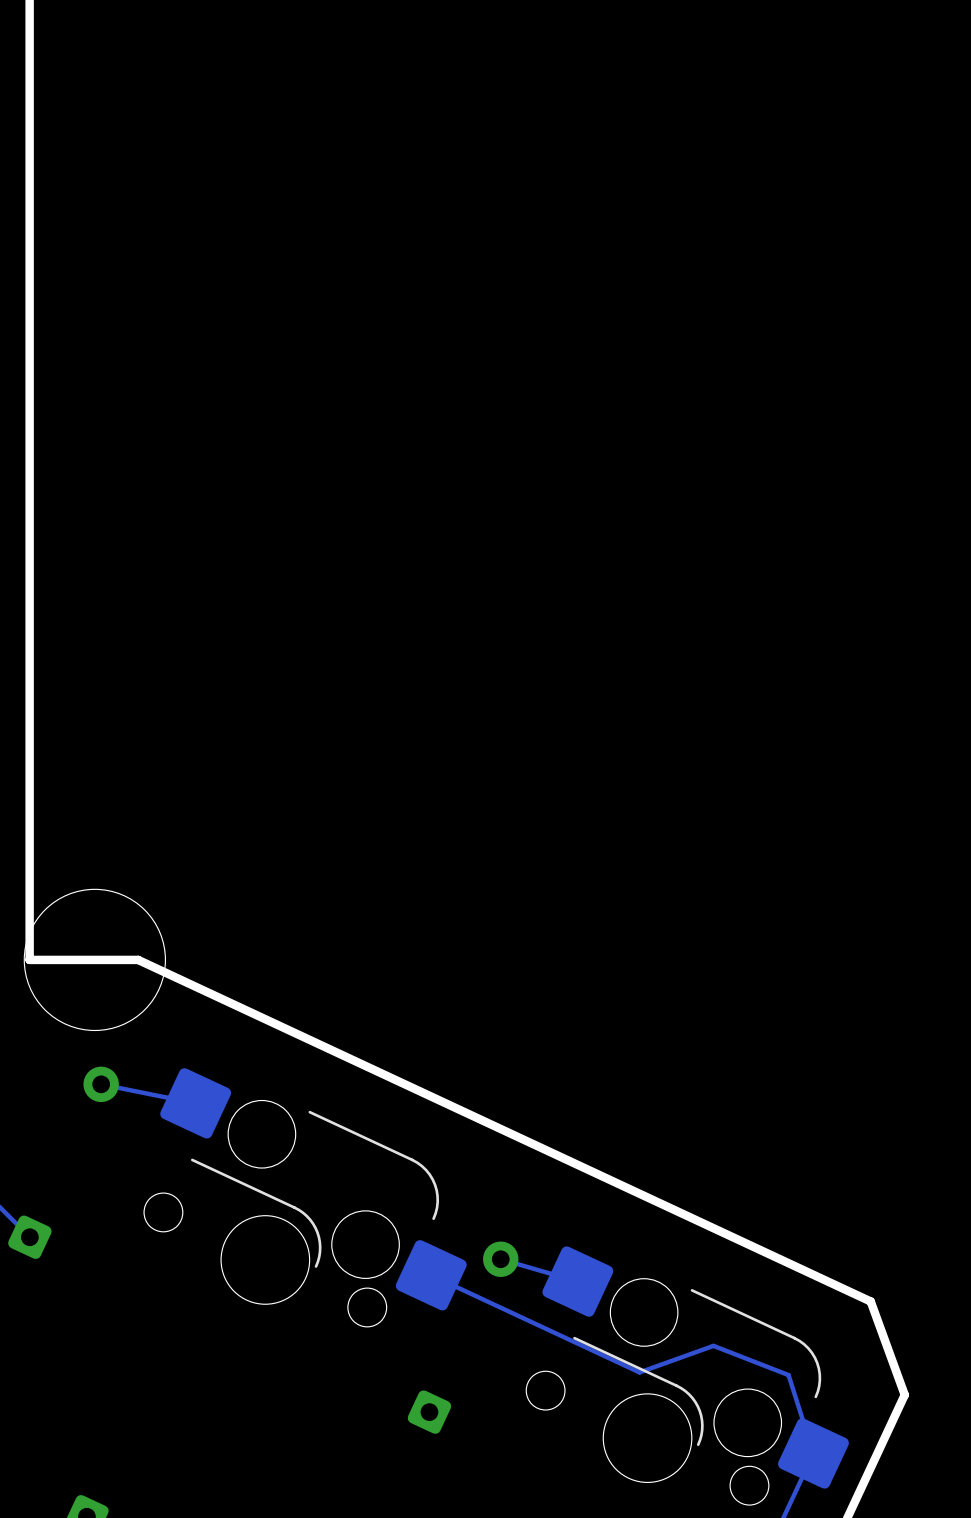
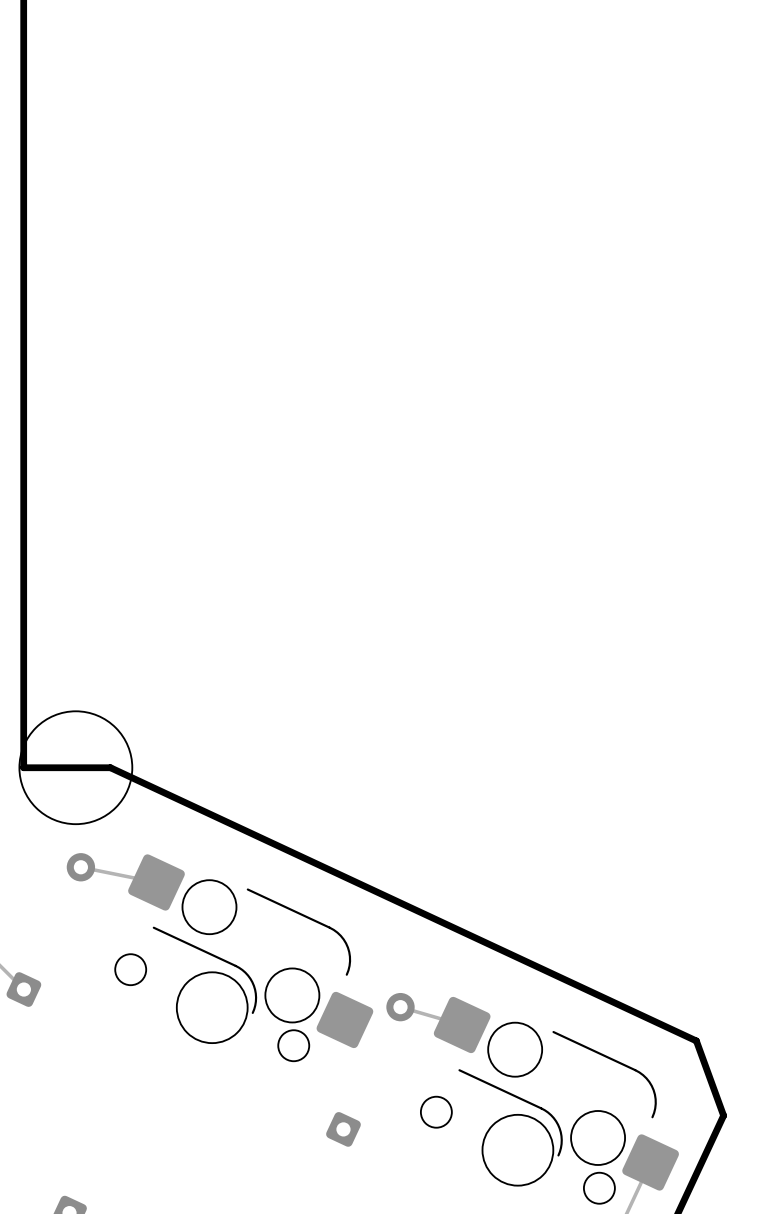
track: (431, 1275) (639, 1372) (713, 1345) (788, 1375) (813, 1453) -> none

